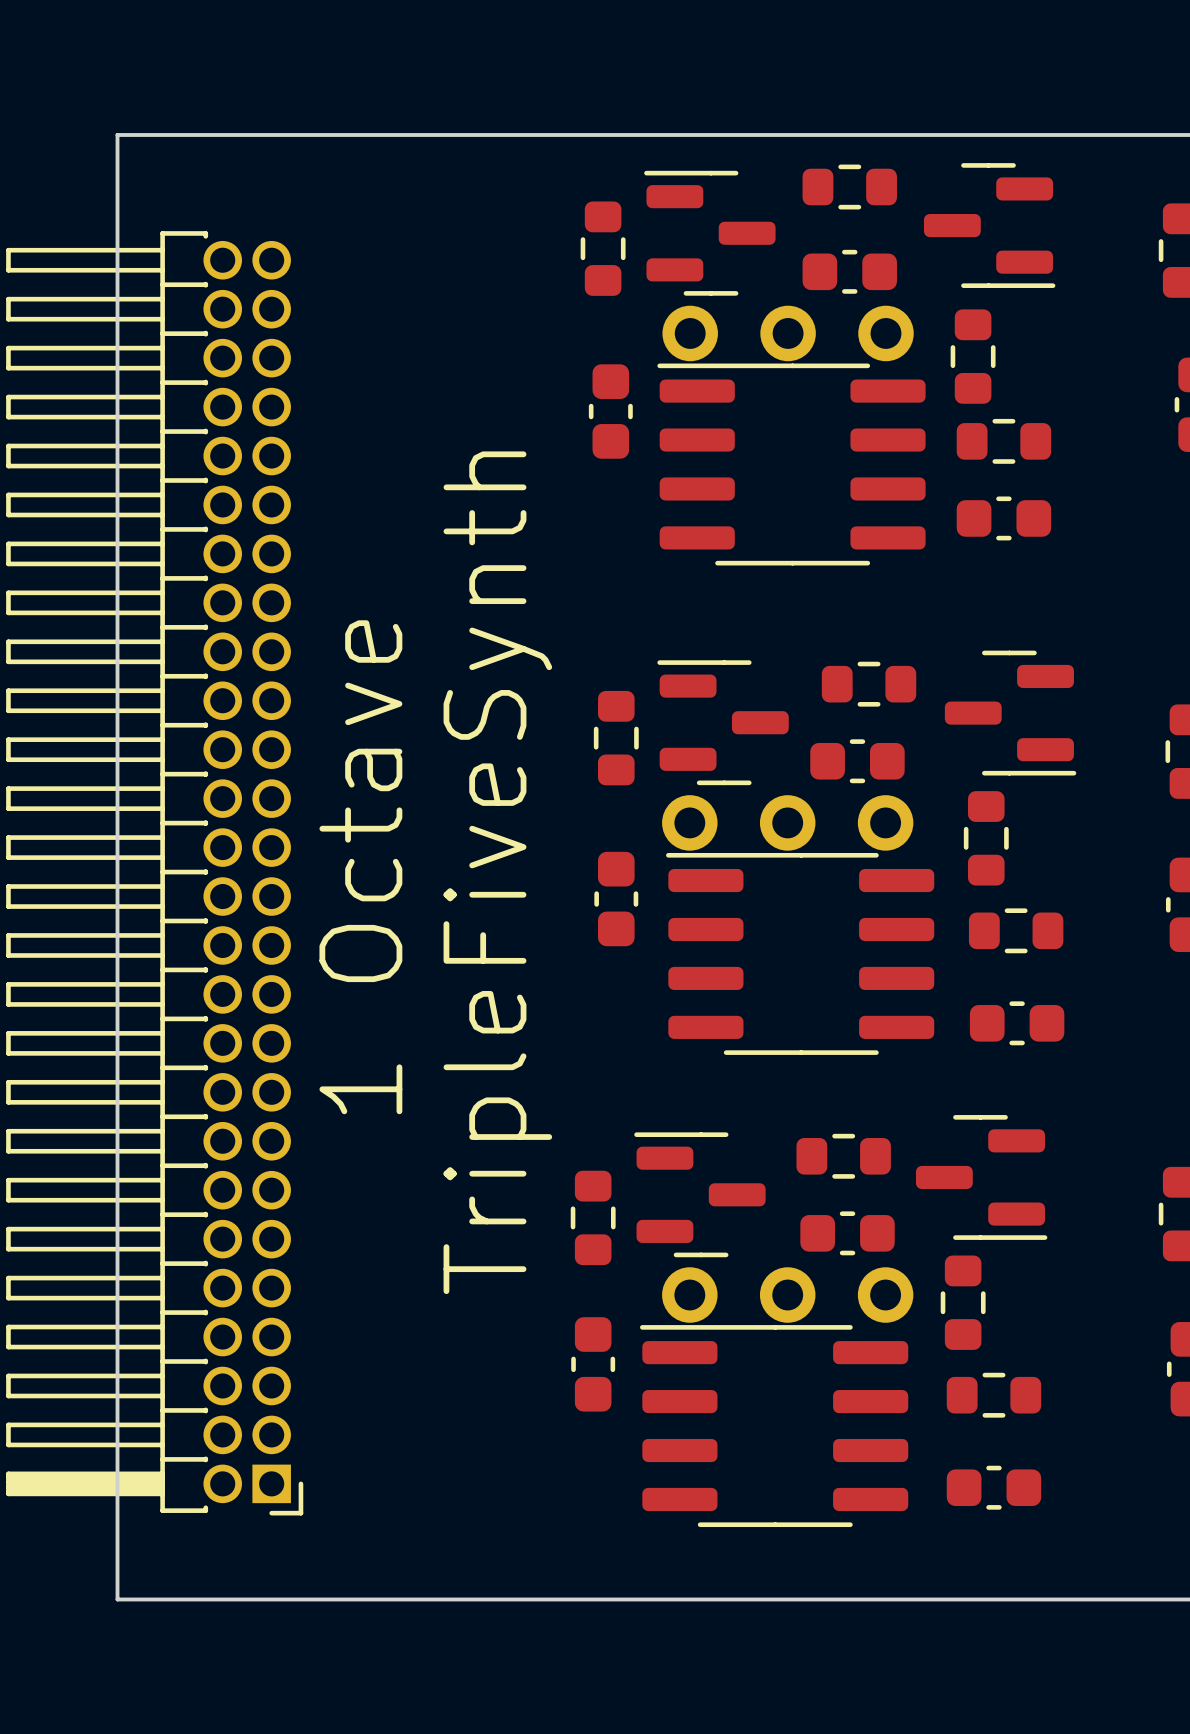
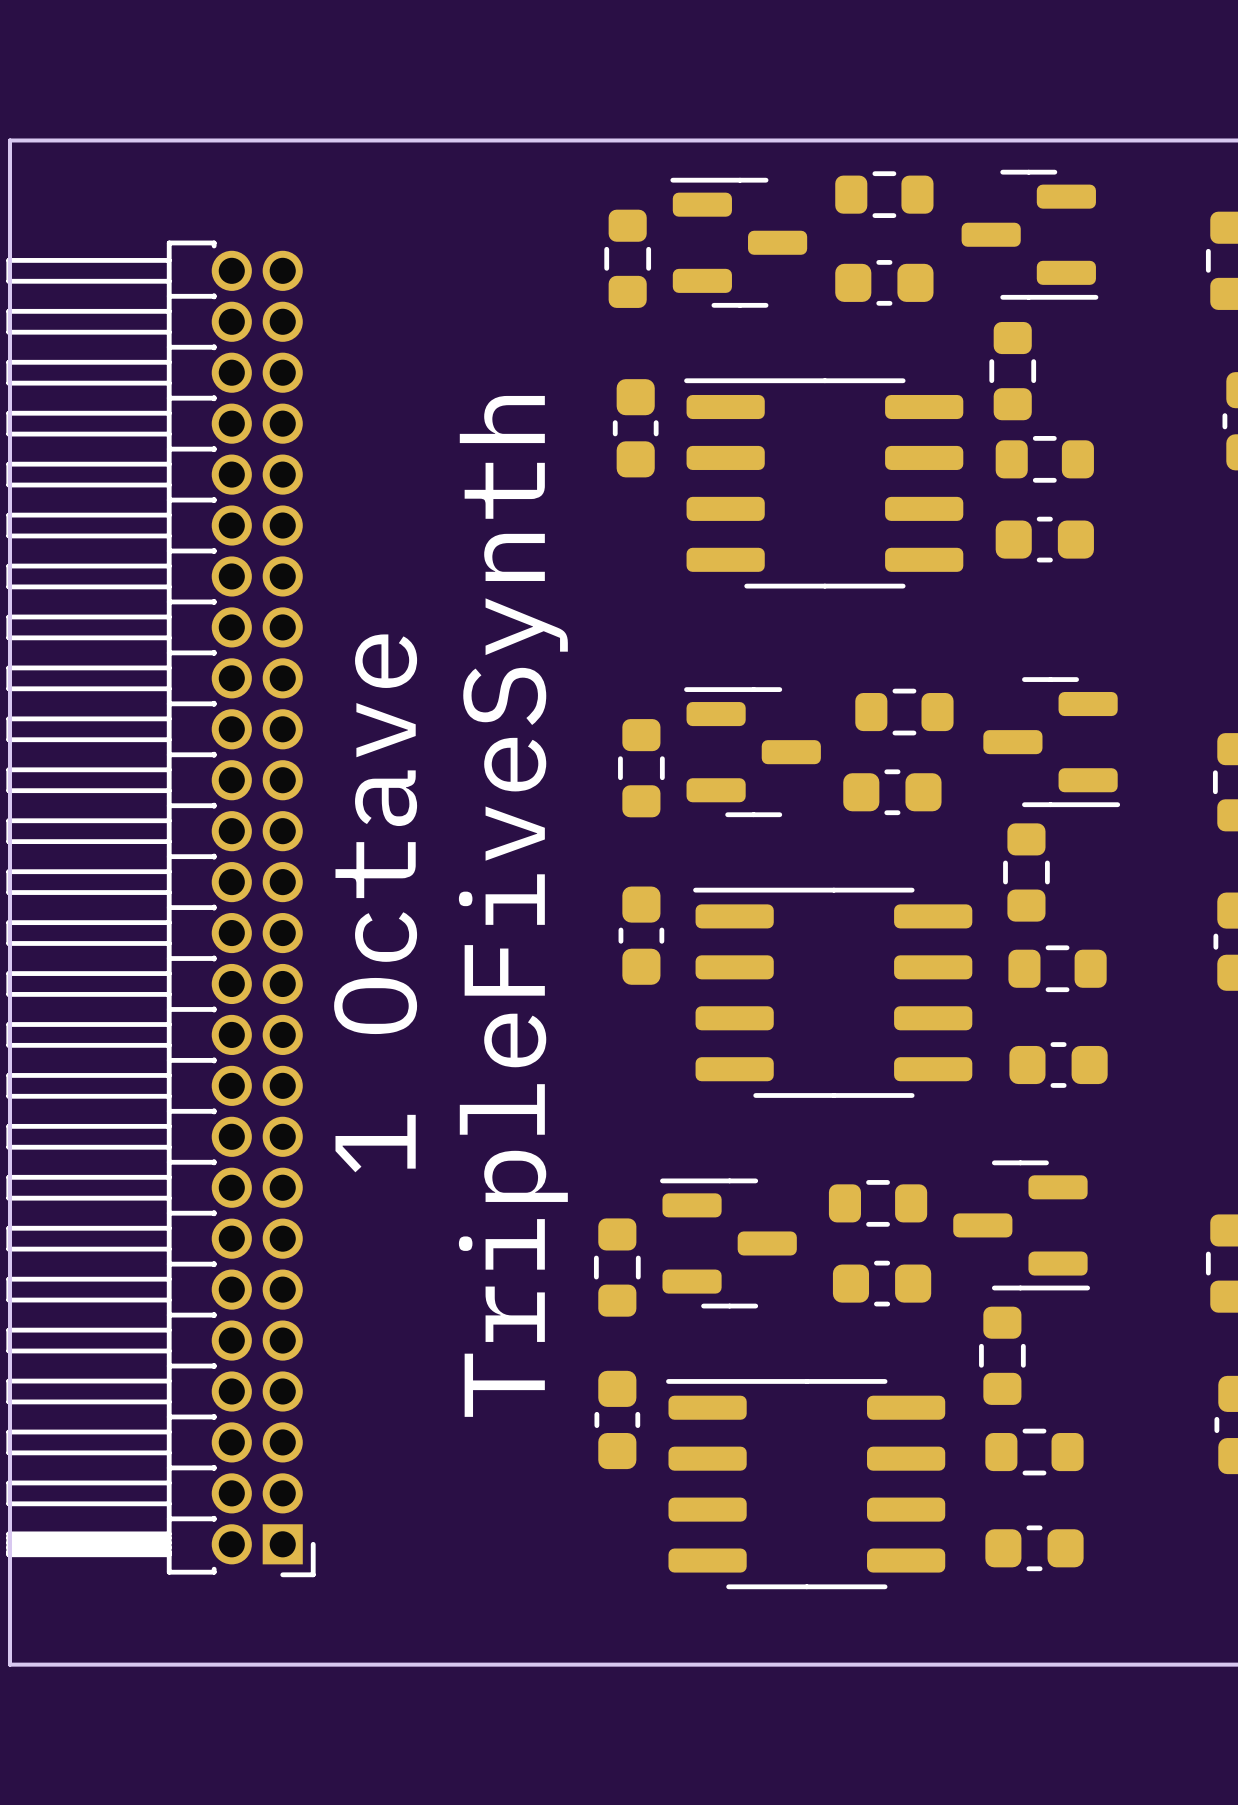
board edge: (117, 134) (117, 1599) -> (122, 140) (9, 140) (9, 1664) (122, 1664)
part: (788, 333) -> none
part: (787, 822) -> none
part: (787, 1295) -> none

